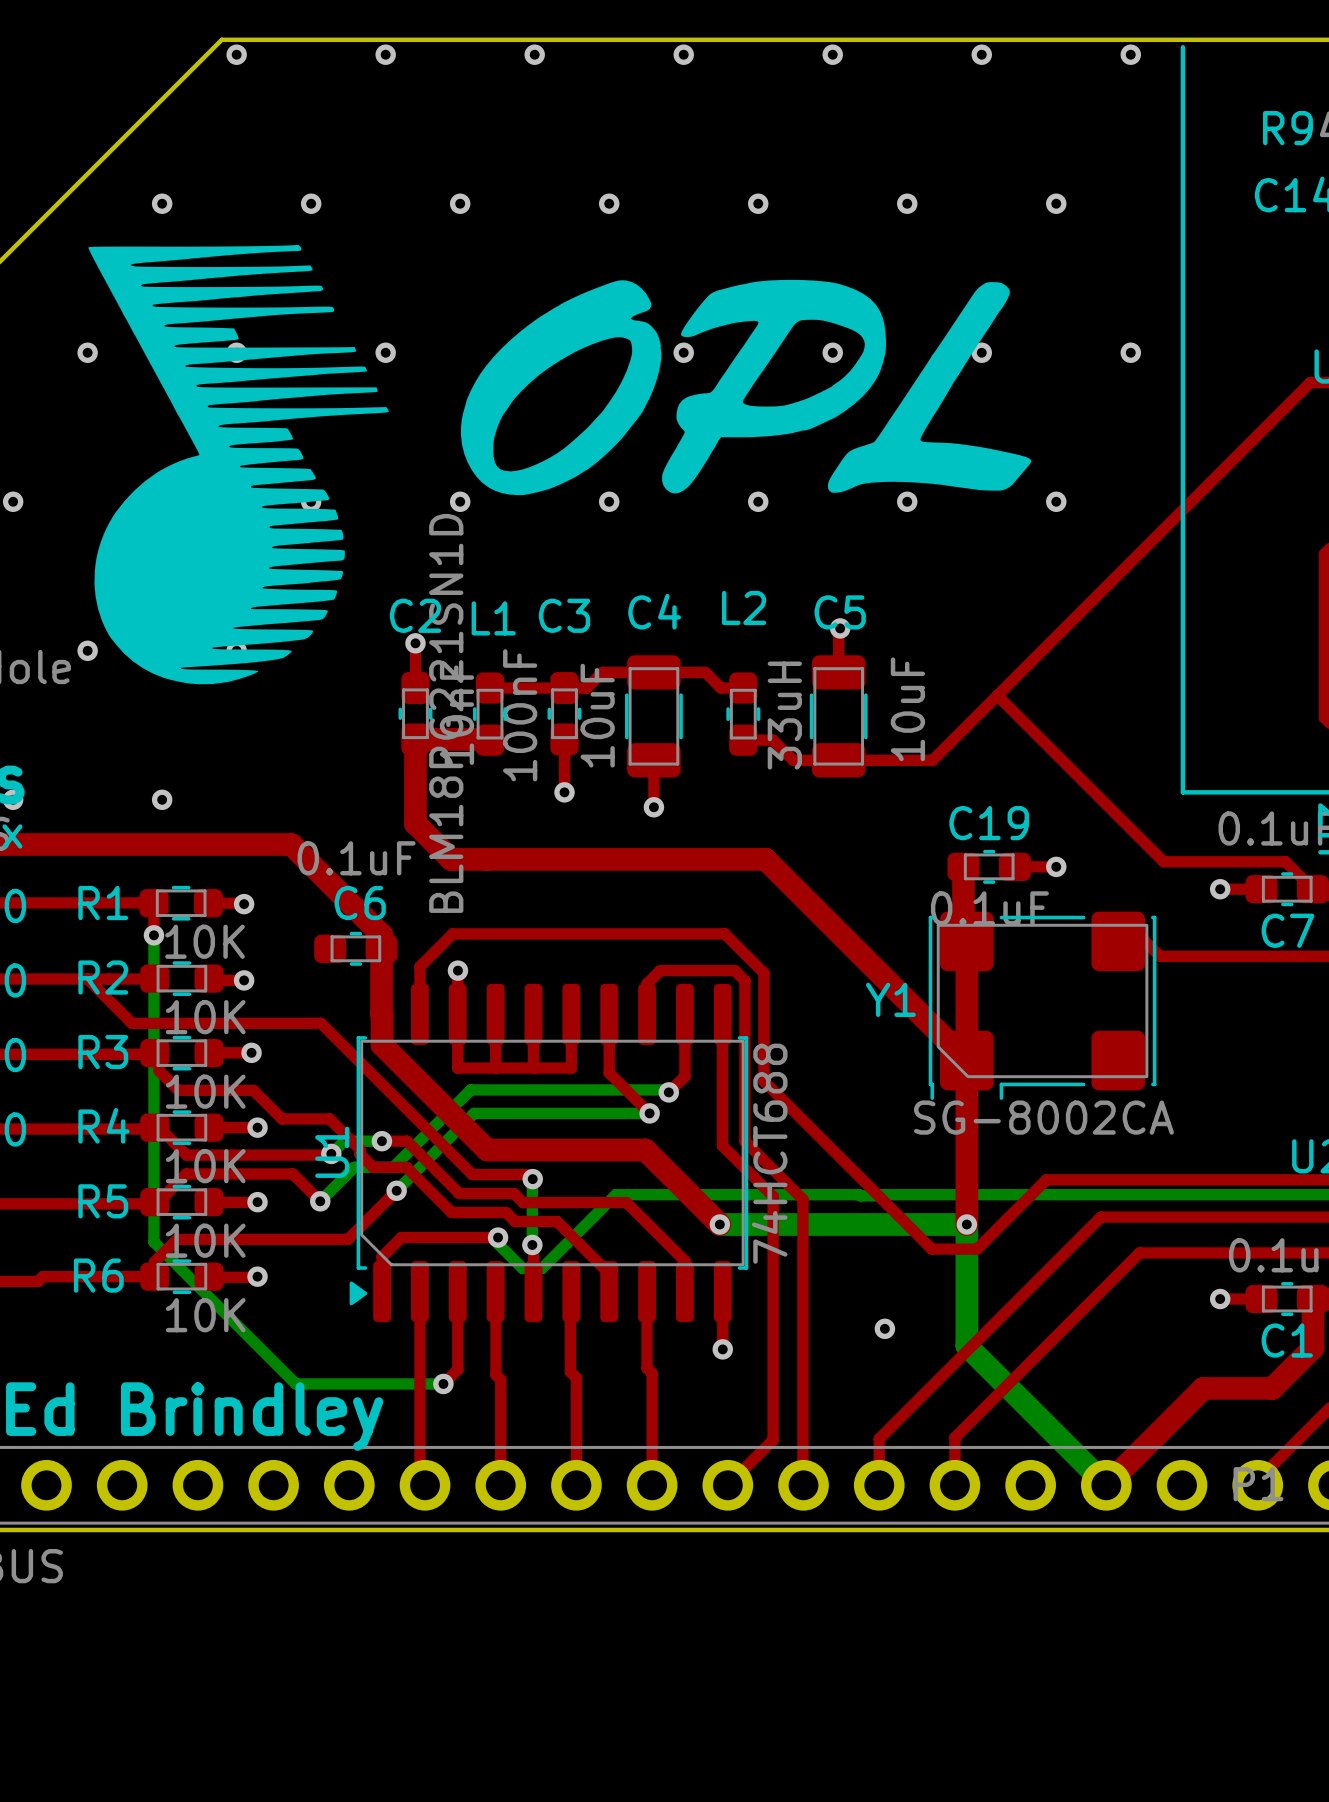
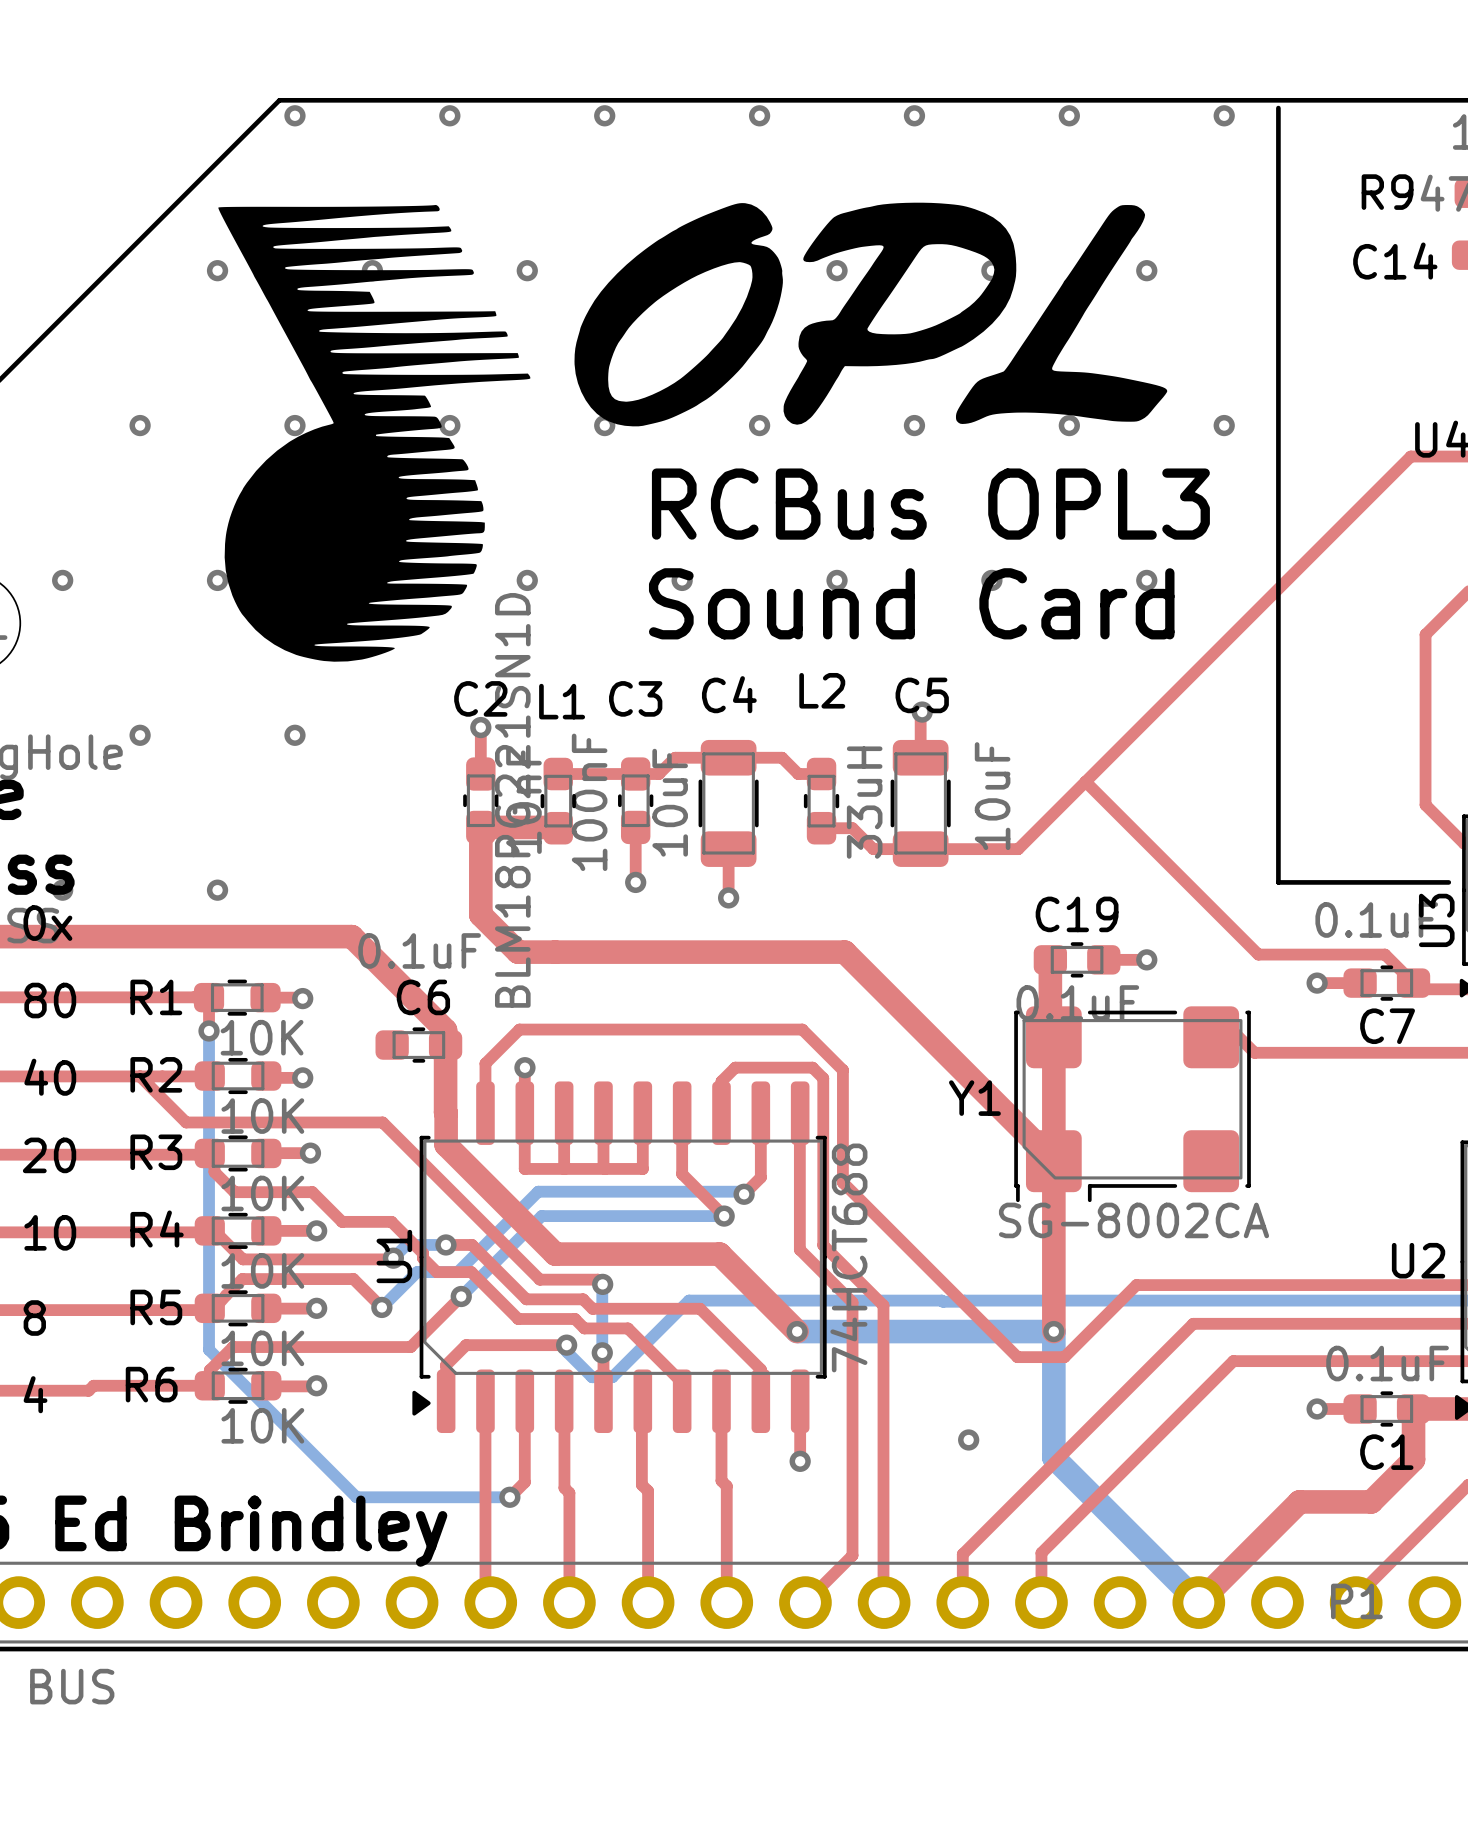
drawing position: (746, 387) -> (870, 314)
text: none -> RCBus OPL3 (930, 504)
drawing position: (238, 464) -> (374, 433)
text: none -> Sound Card (911, 603)

